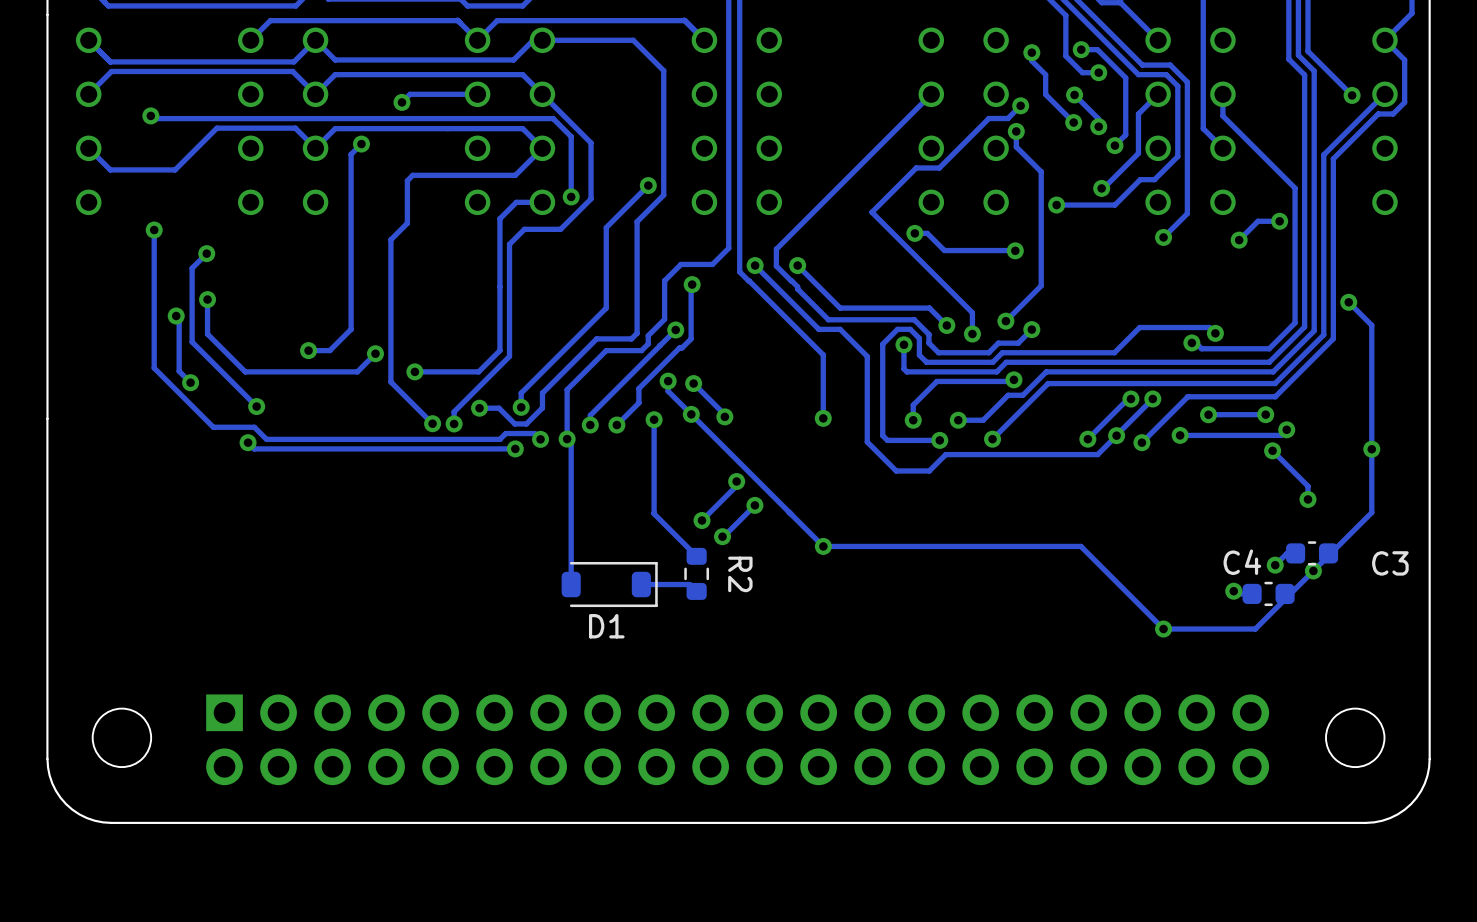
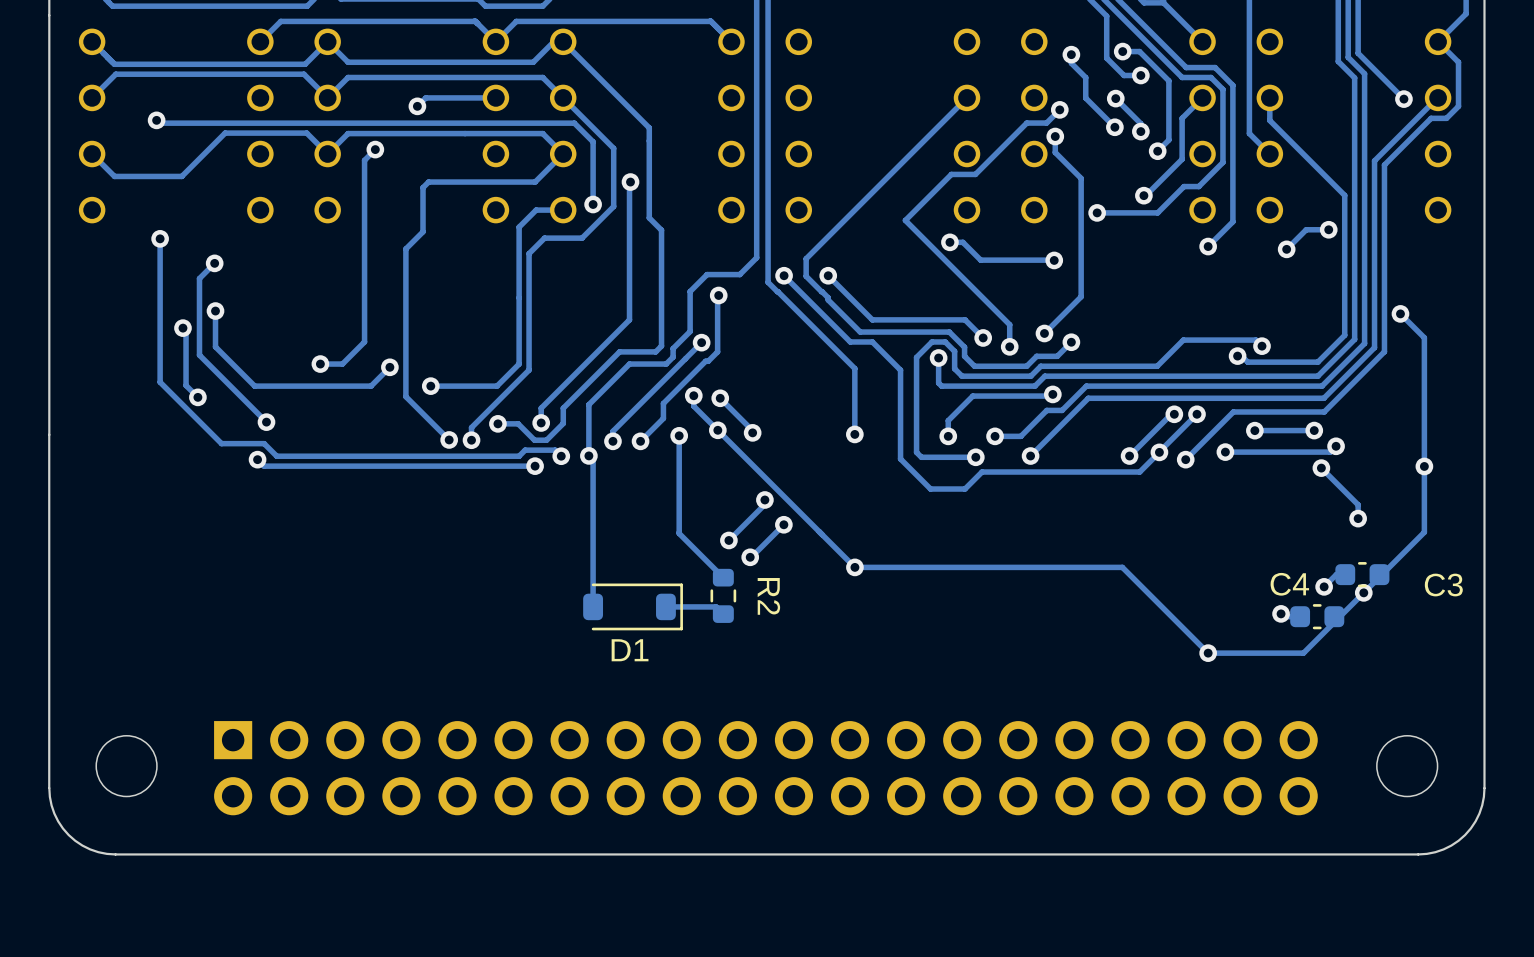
track: (542, 40) (633, 40) (663, 70) (663, 195) (637, 221) -> (563, 41) (649, 127) (649, 217) (661, 230)
track: (648, 185) (606, 227) -> (630, 182) (629, 236)
via position: (648, 185) -> (630, 182)

